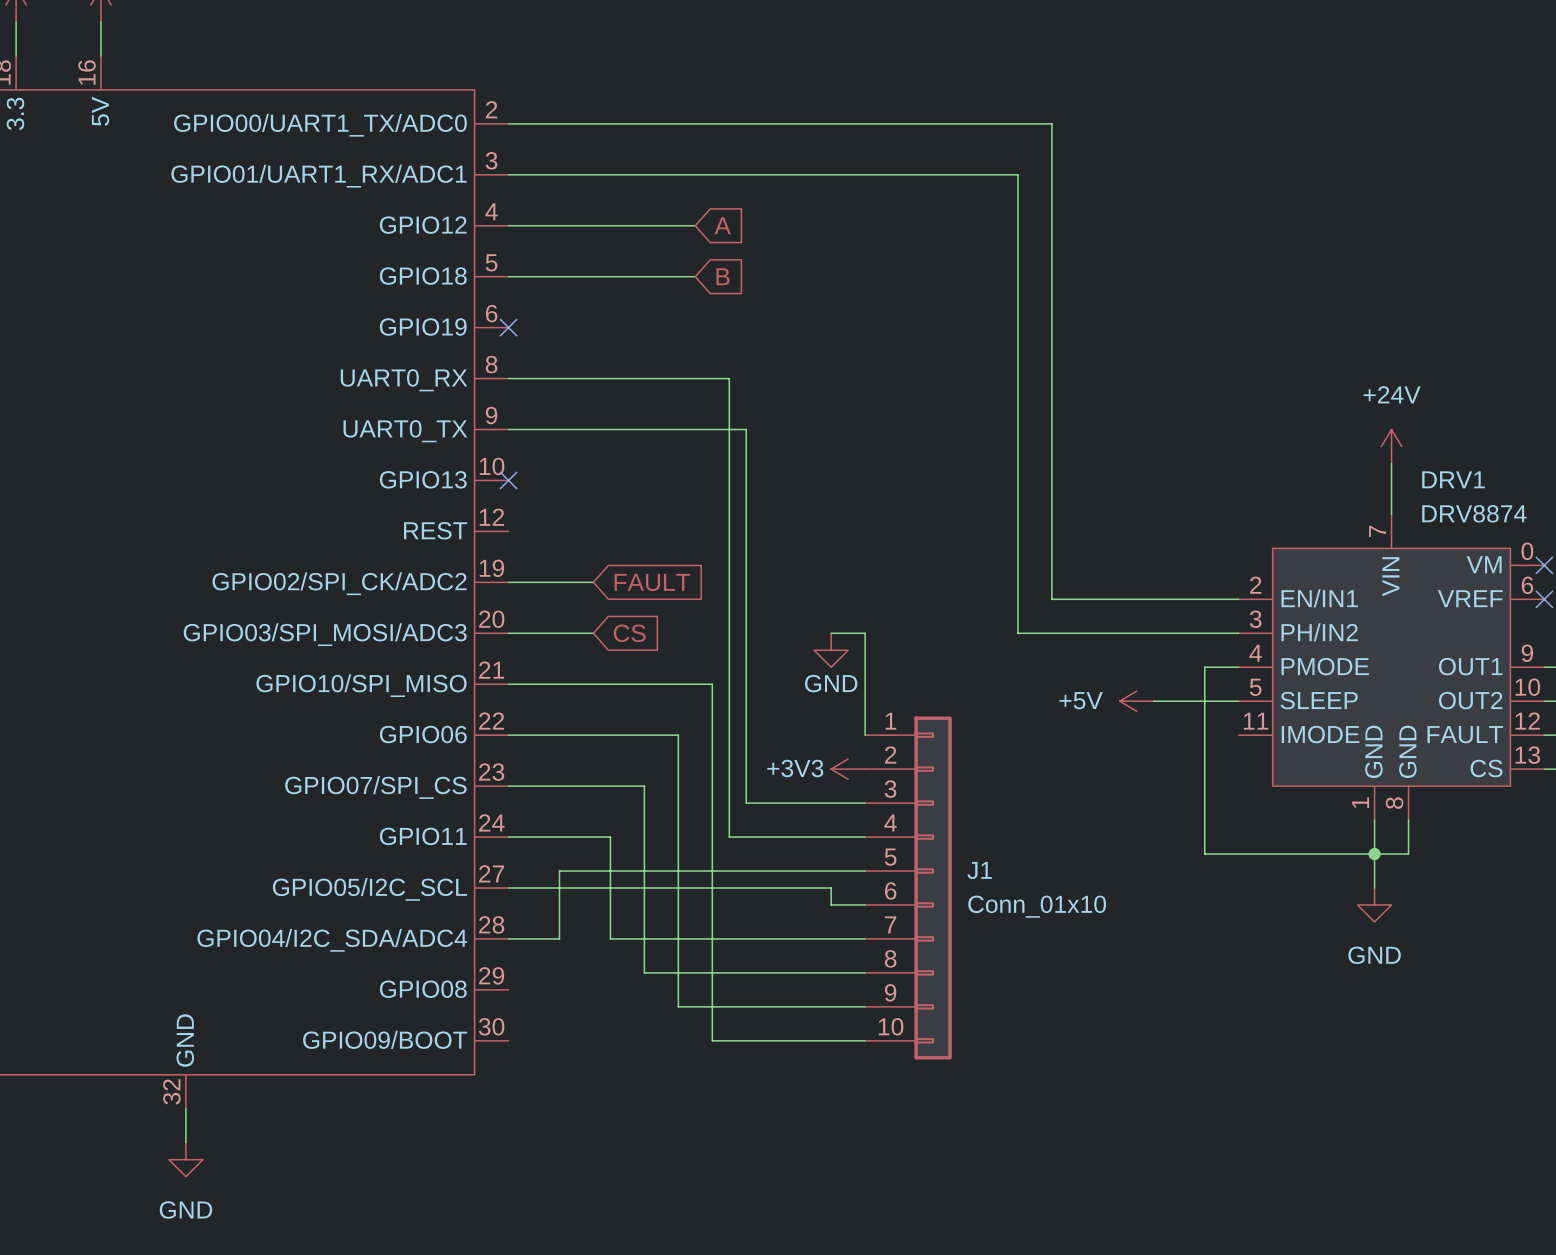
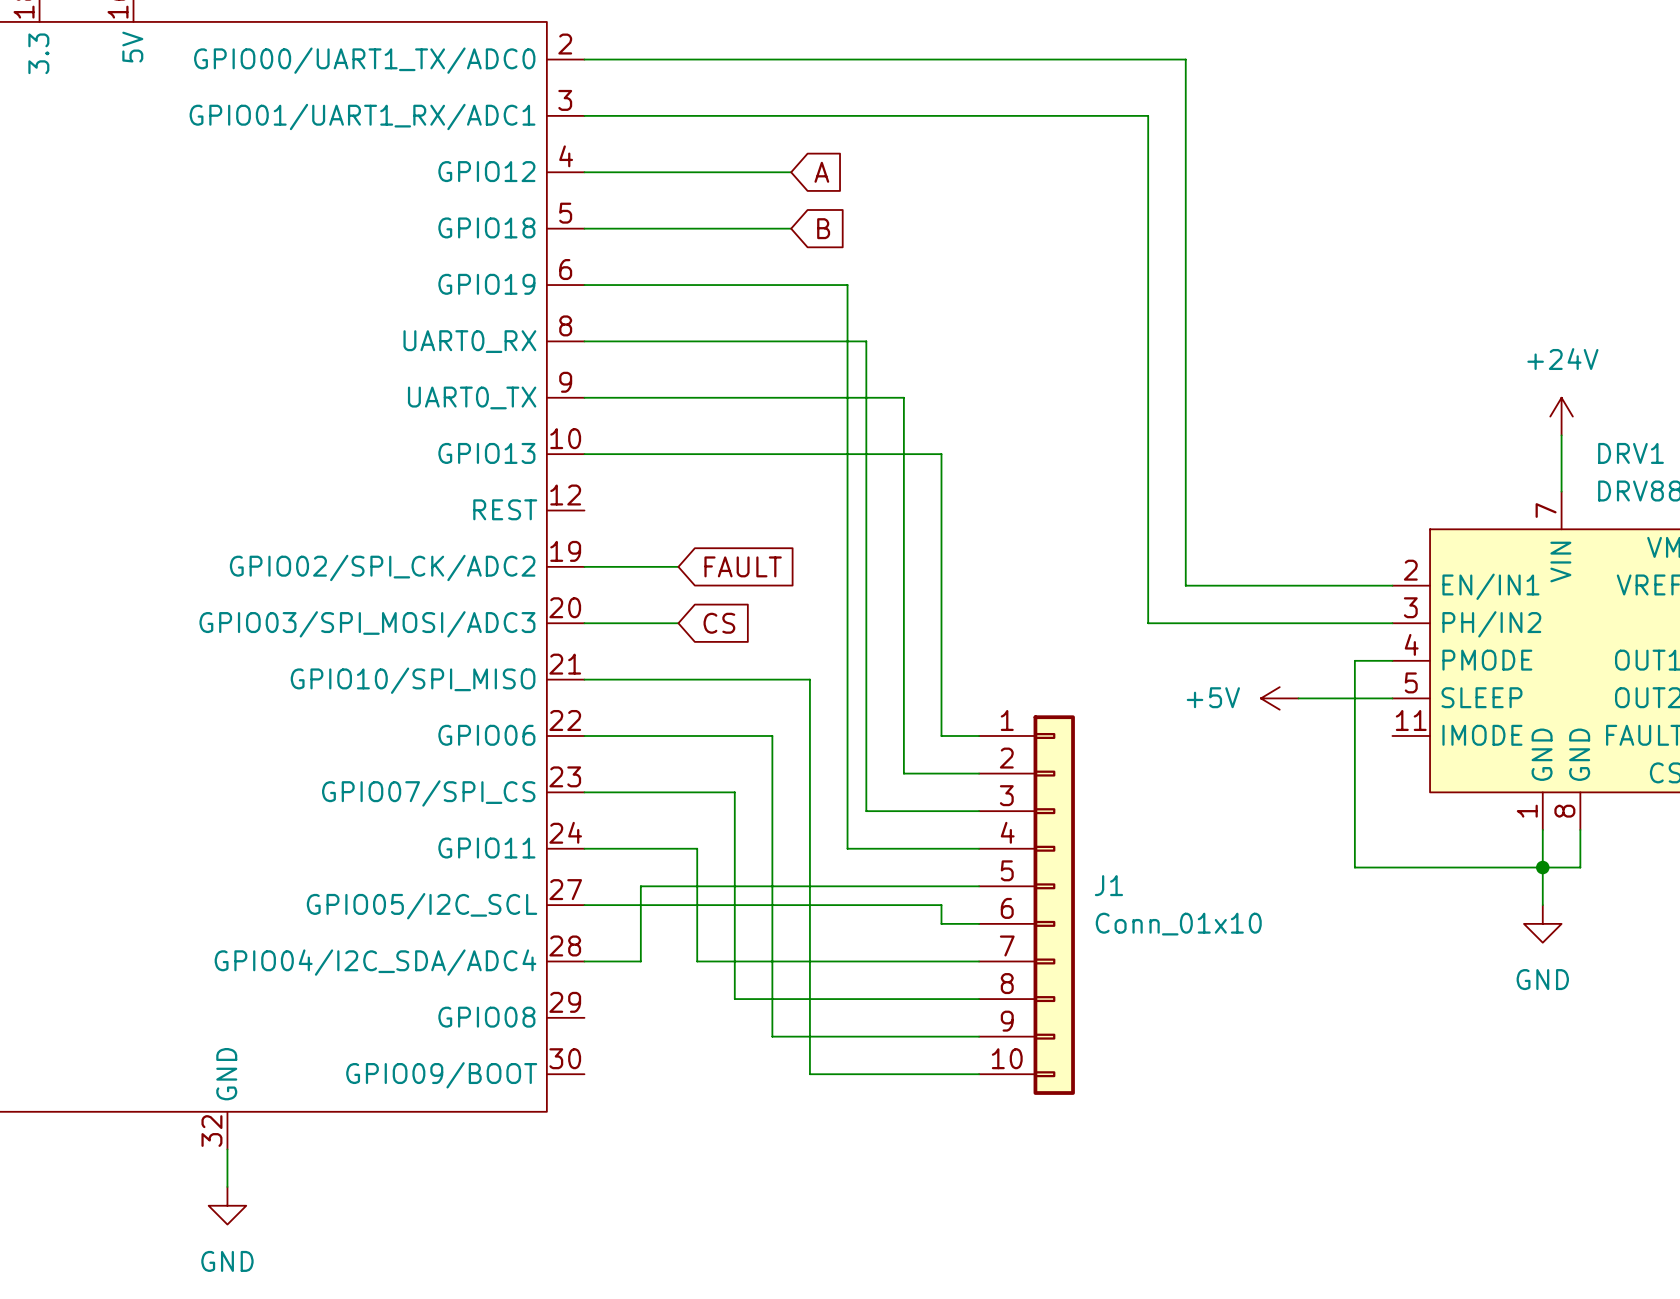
wire: none -> (584, 285) (847, 285) (847, 397) (903, 397) (903, 773) (979, 773)
no-connect mark: (508, 327) -> none
wire: (729, 378) (729, 837) (746, 837) -> (828, 341) (866, 341) (866, 811)
no-connect mark: (508, 480) -> none
wire: (831, 633) (865, 633) (865, 735) -> (584, 454) (941, 454) (941, 735) (979, 735)
power symbol: GND (831, 650) -> none
power symbol: +3V3 (848, 769) -> none
wire: (746, 803) (763, 803) -> (847, 811) (847, 848)

